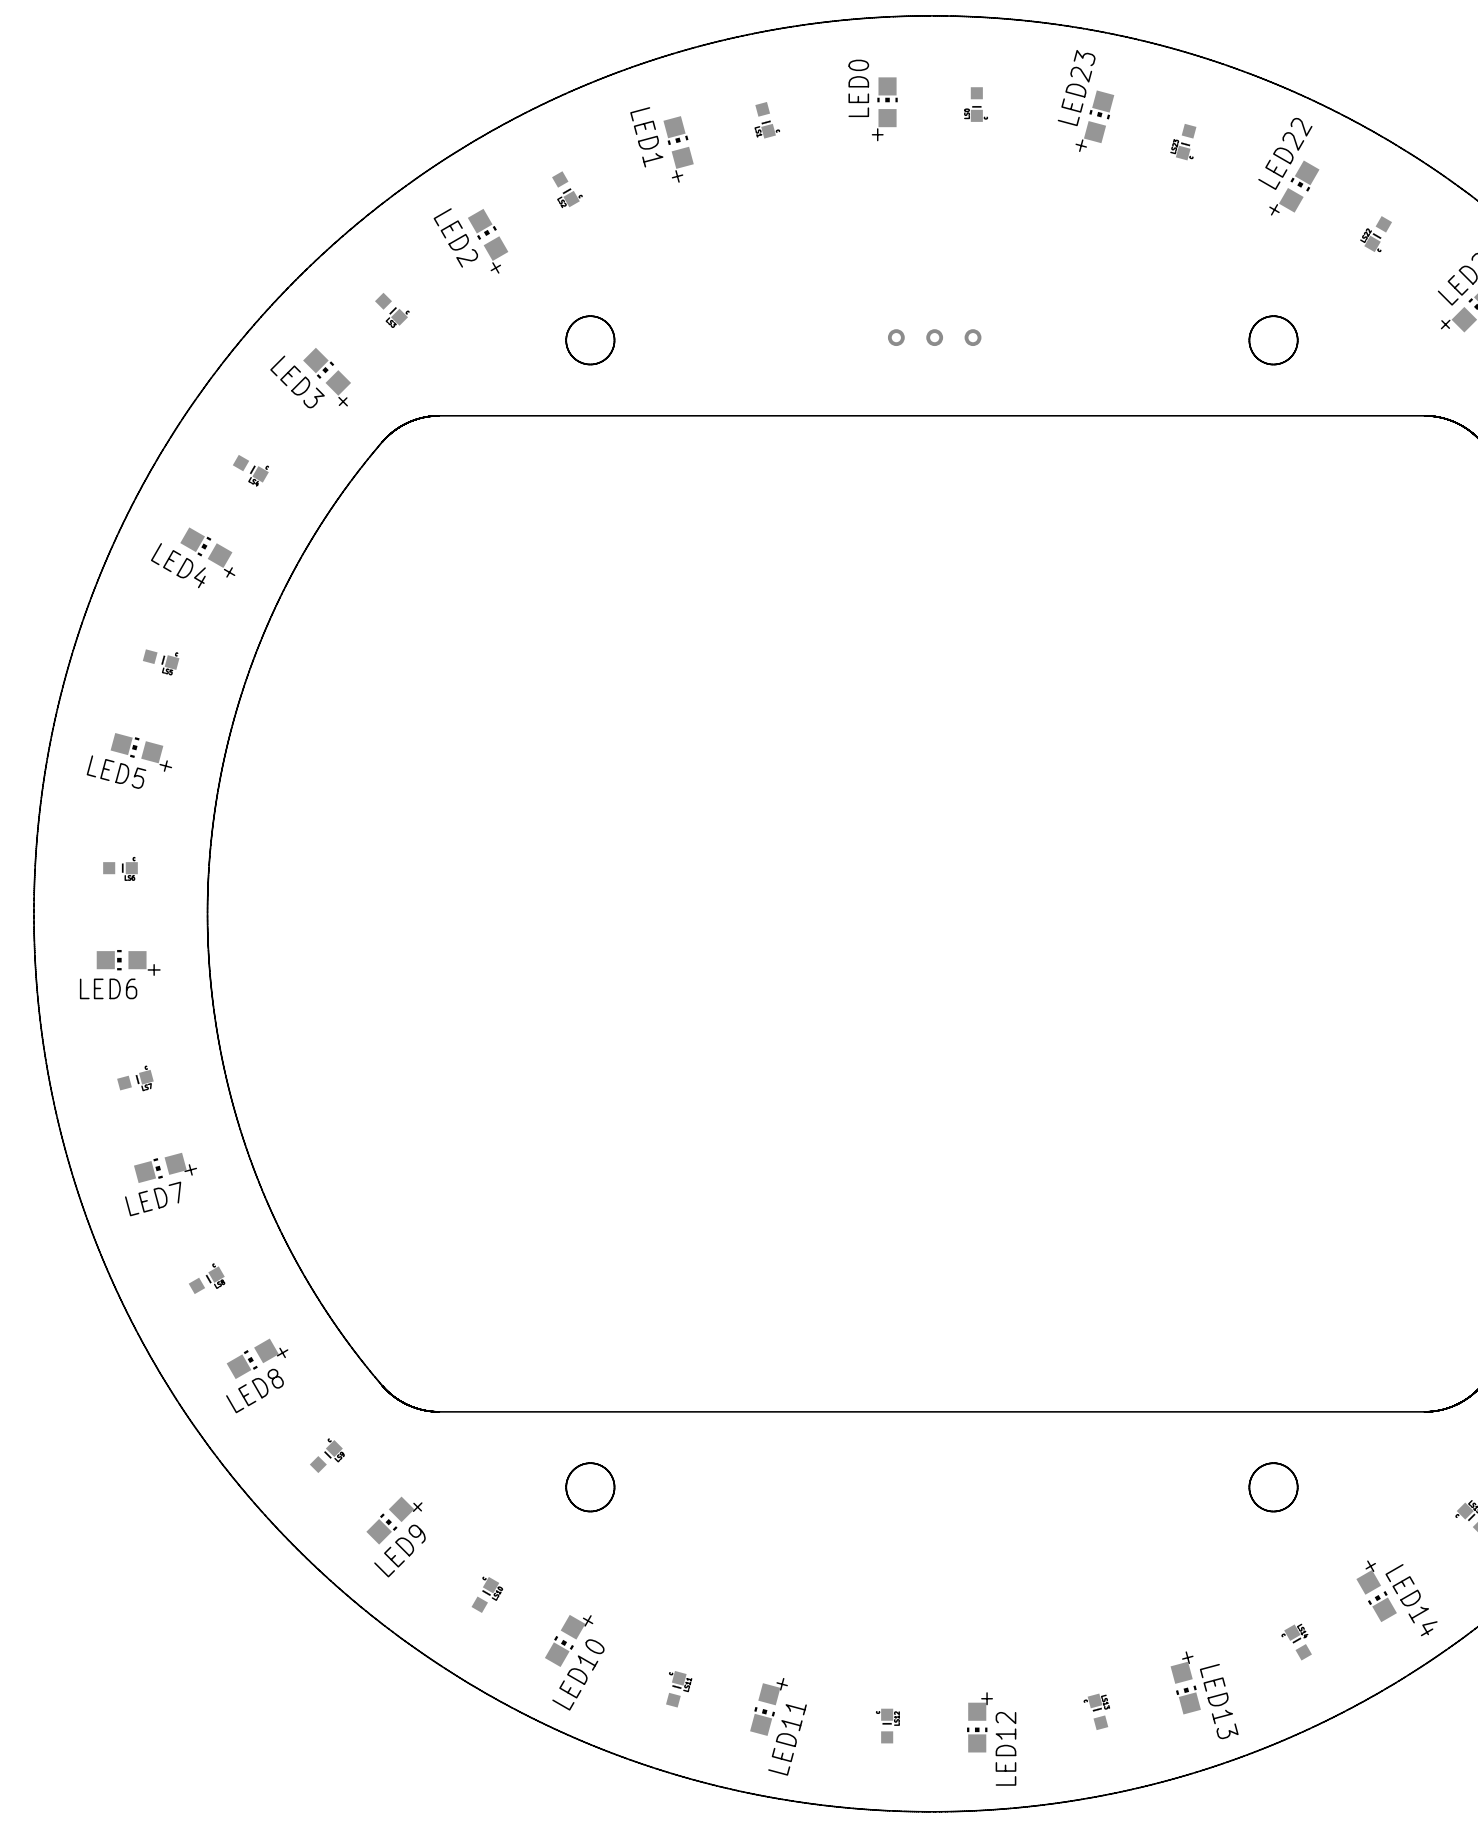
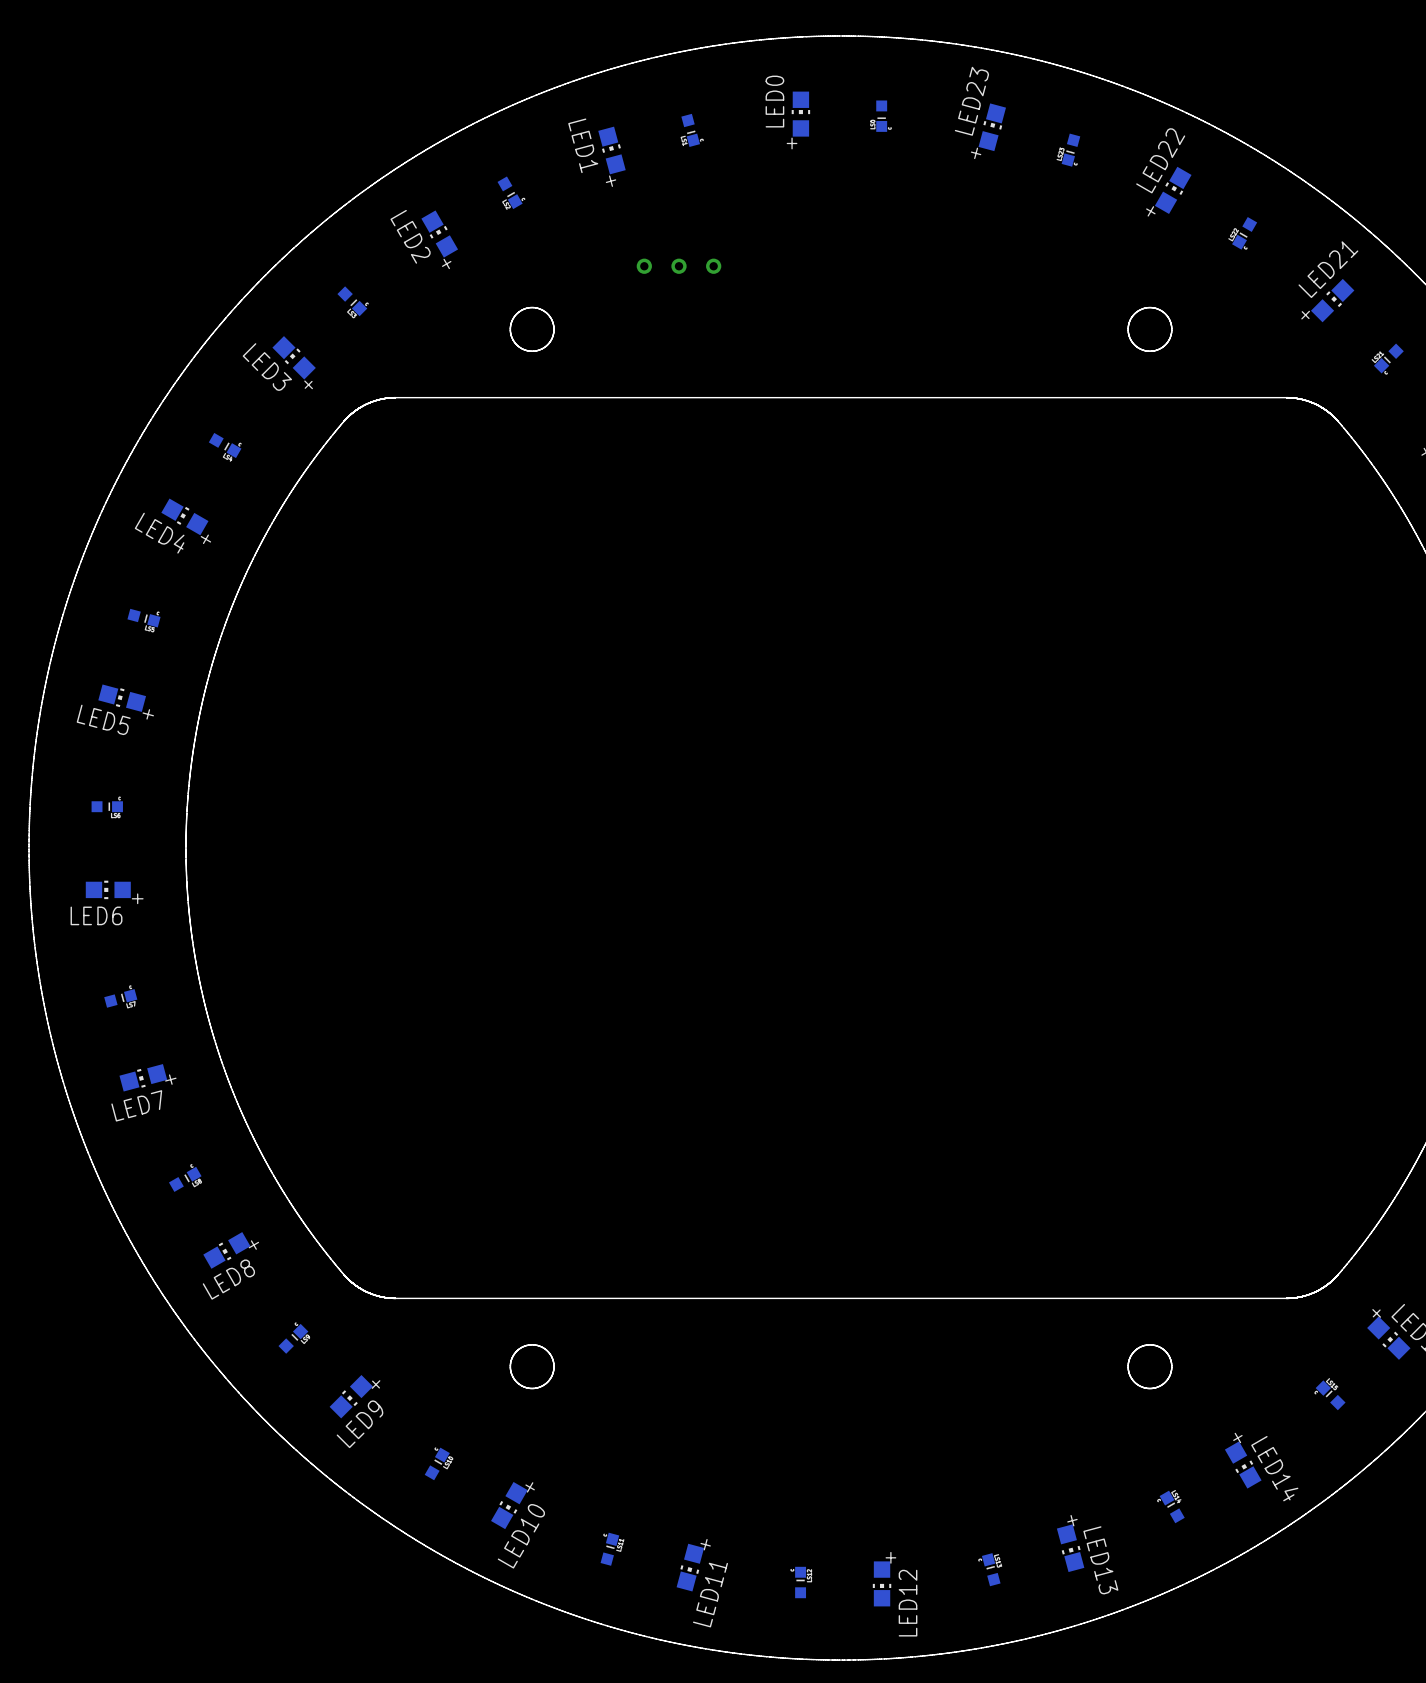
part position: (934, 337) -> (679, 266)

